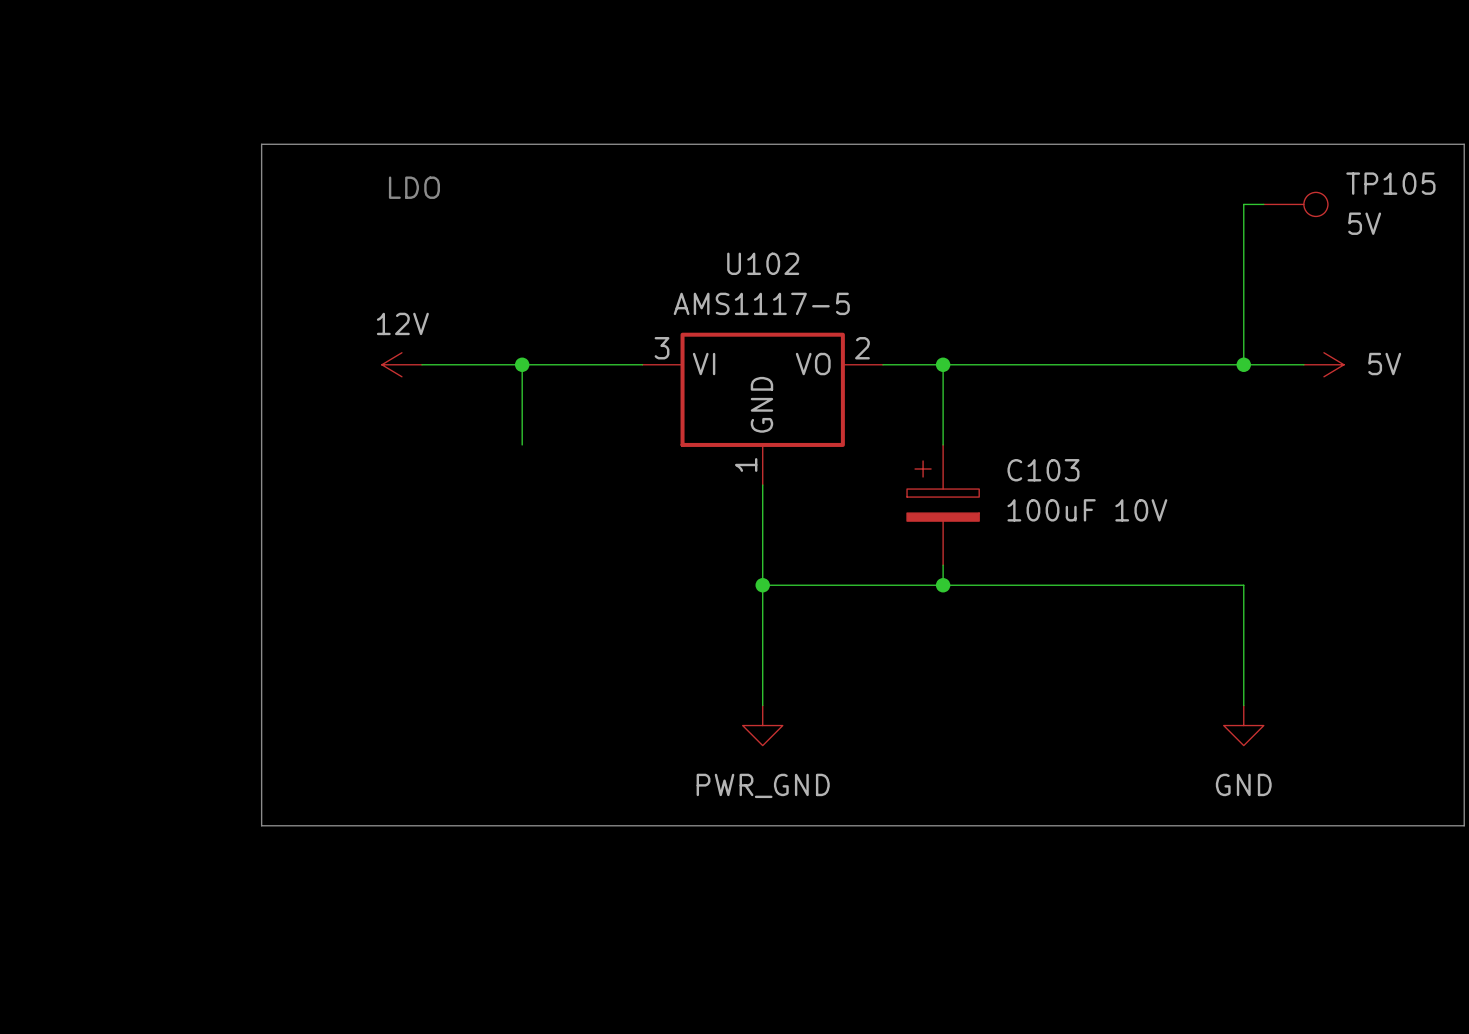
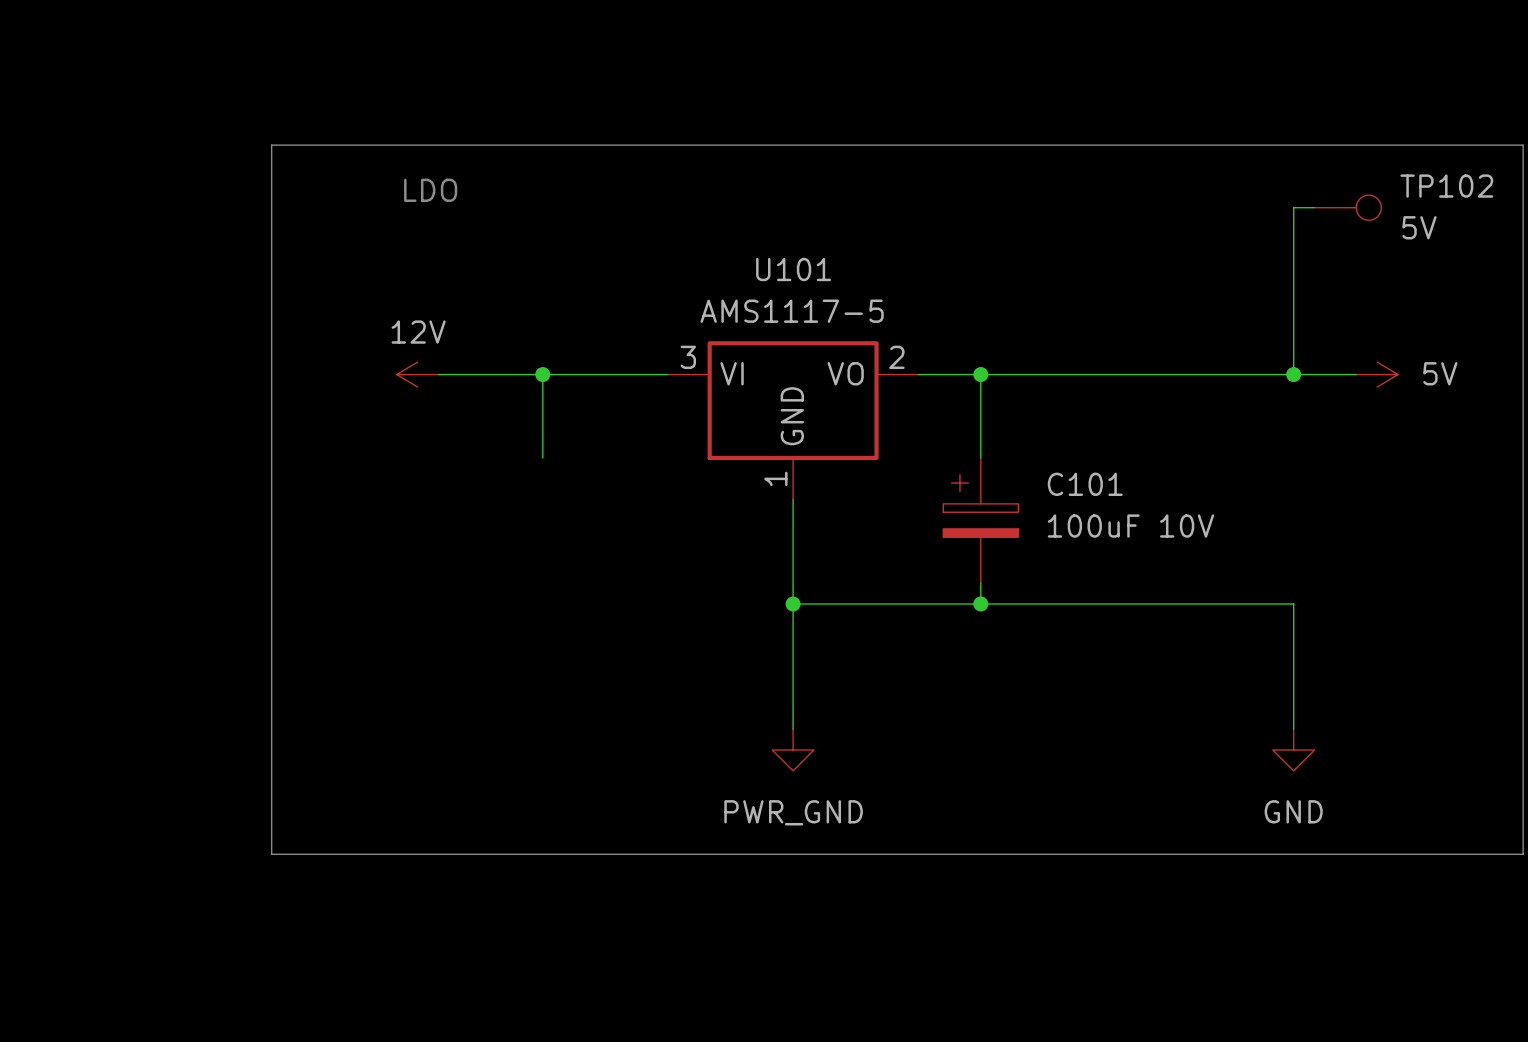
TP105 name: TP105 (1390, 183) -> TP102 (1446, 186)
U102 name: U102 (763, 263) -> U101 (793, 269)
C103 name: C103 (1043, 470) -> C101 (1085, 484)

